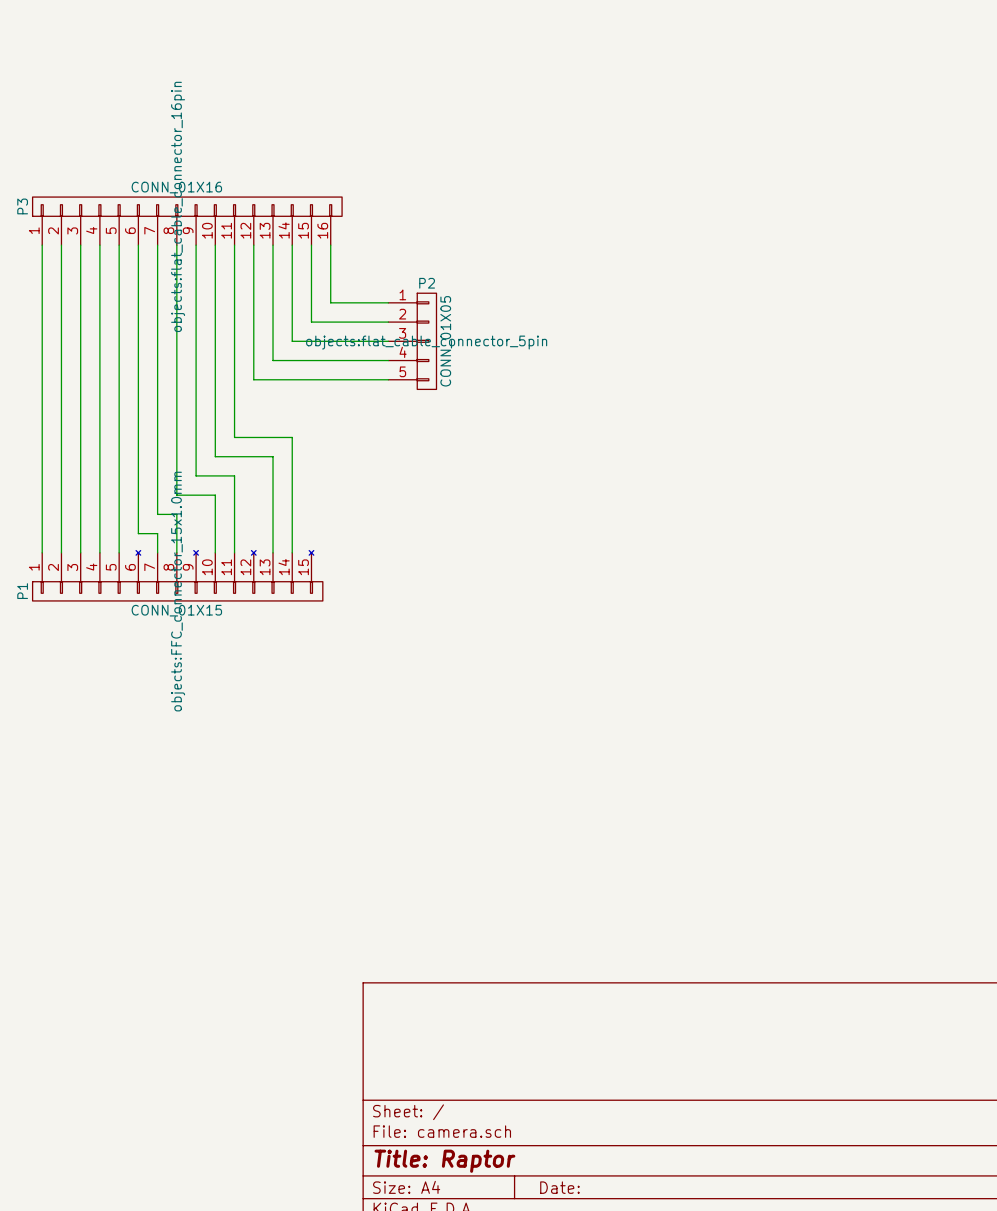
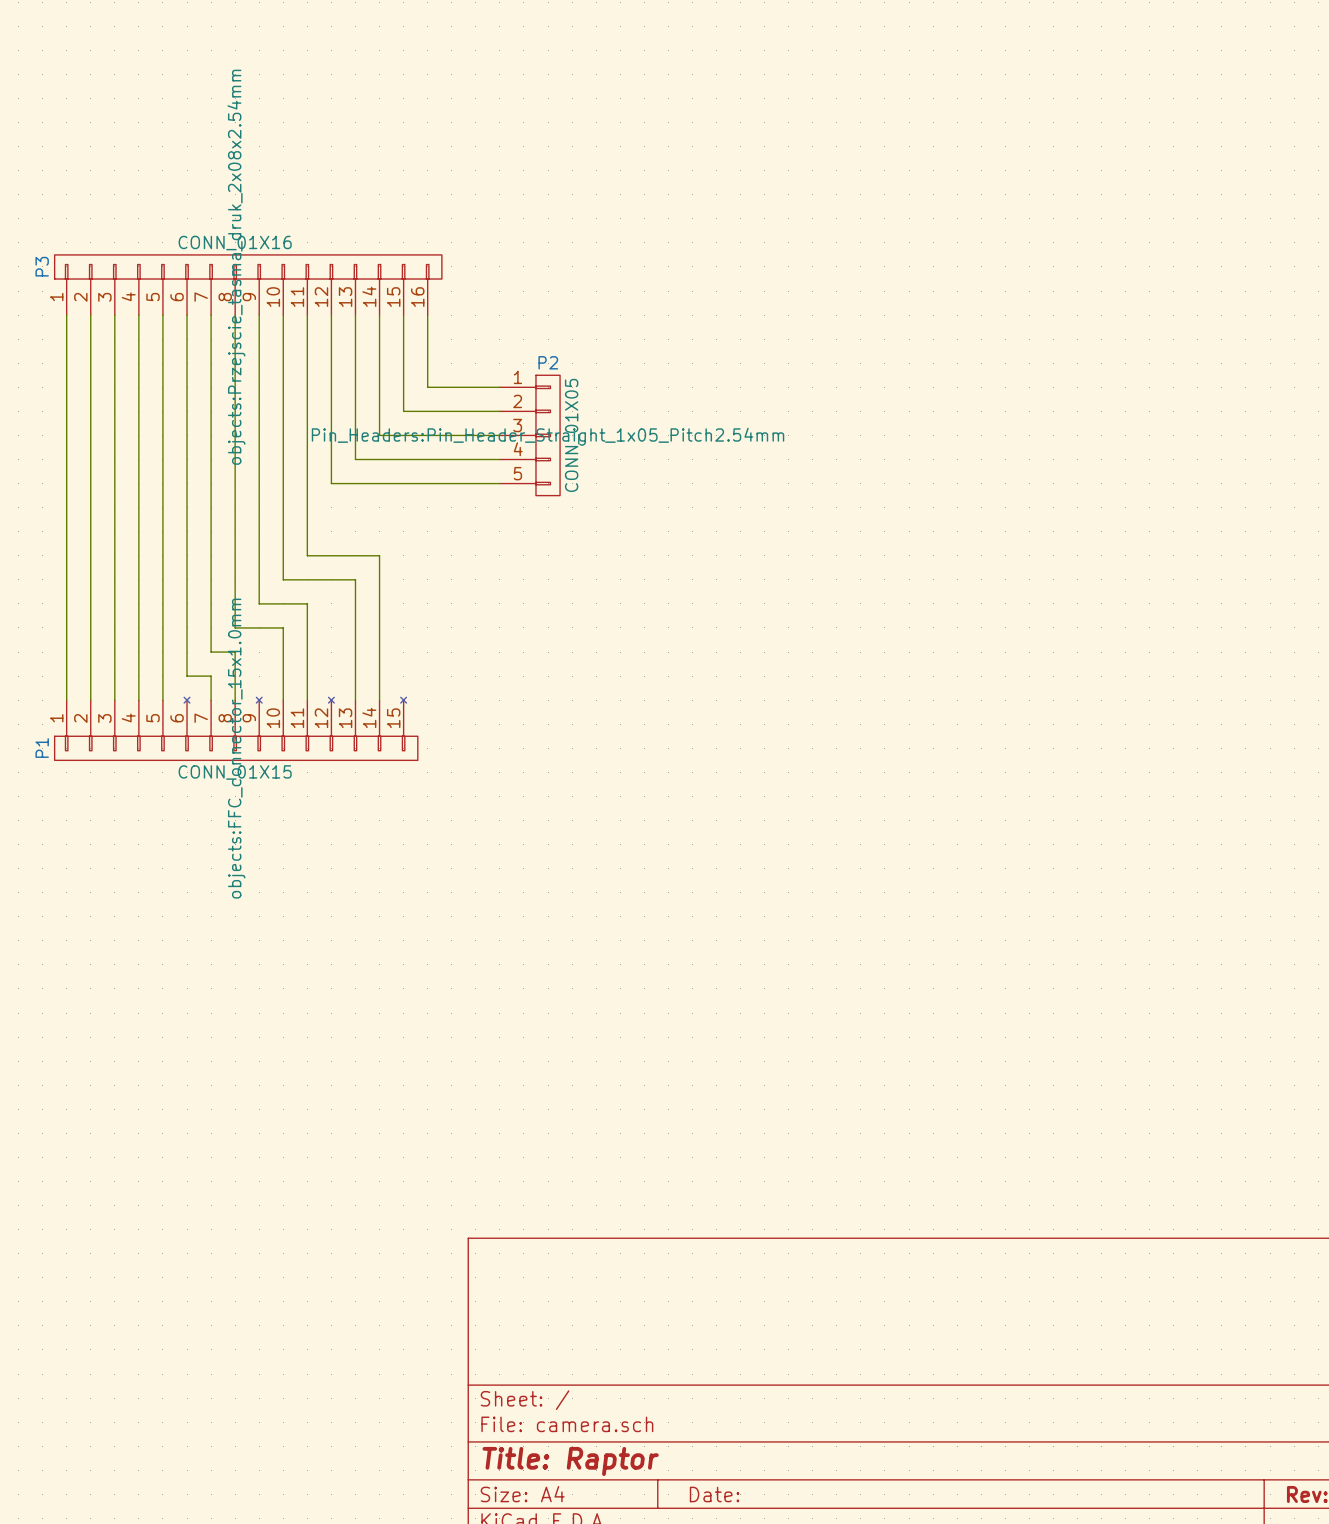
P3 text: objects:flat_cable_connector_16pin (178, 206) -> objects:Przejscie_tasma_druk_2x08x2.54mm (236, 267)
P2 text: objects:flat_cable_connector_5pin (426, 342) -> Pin_Headers:Pin_Header_Straight_1x05_Pitch2.54mm (548, 436)

